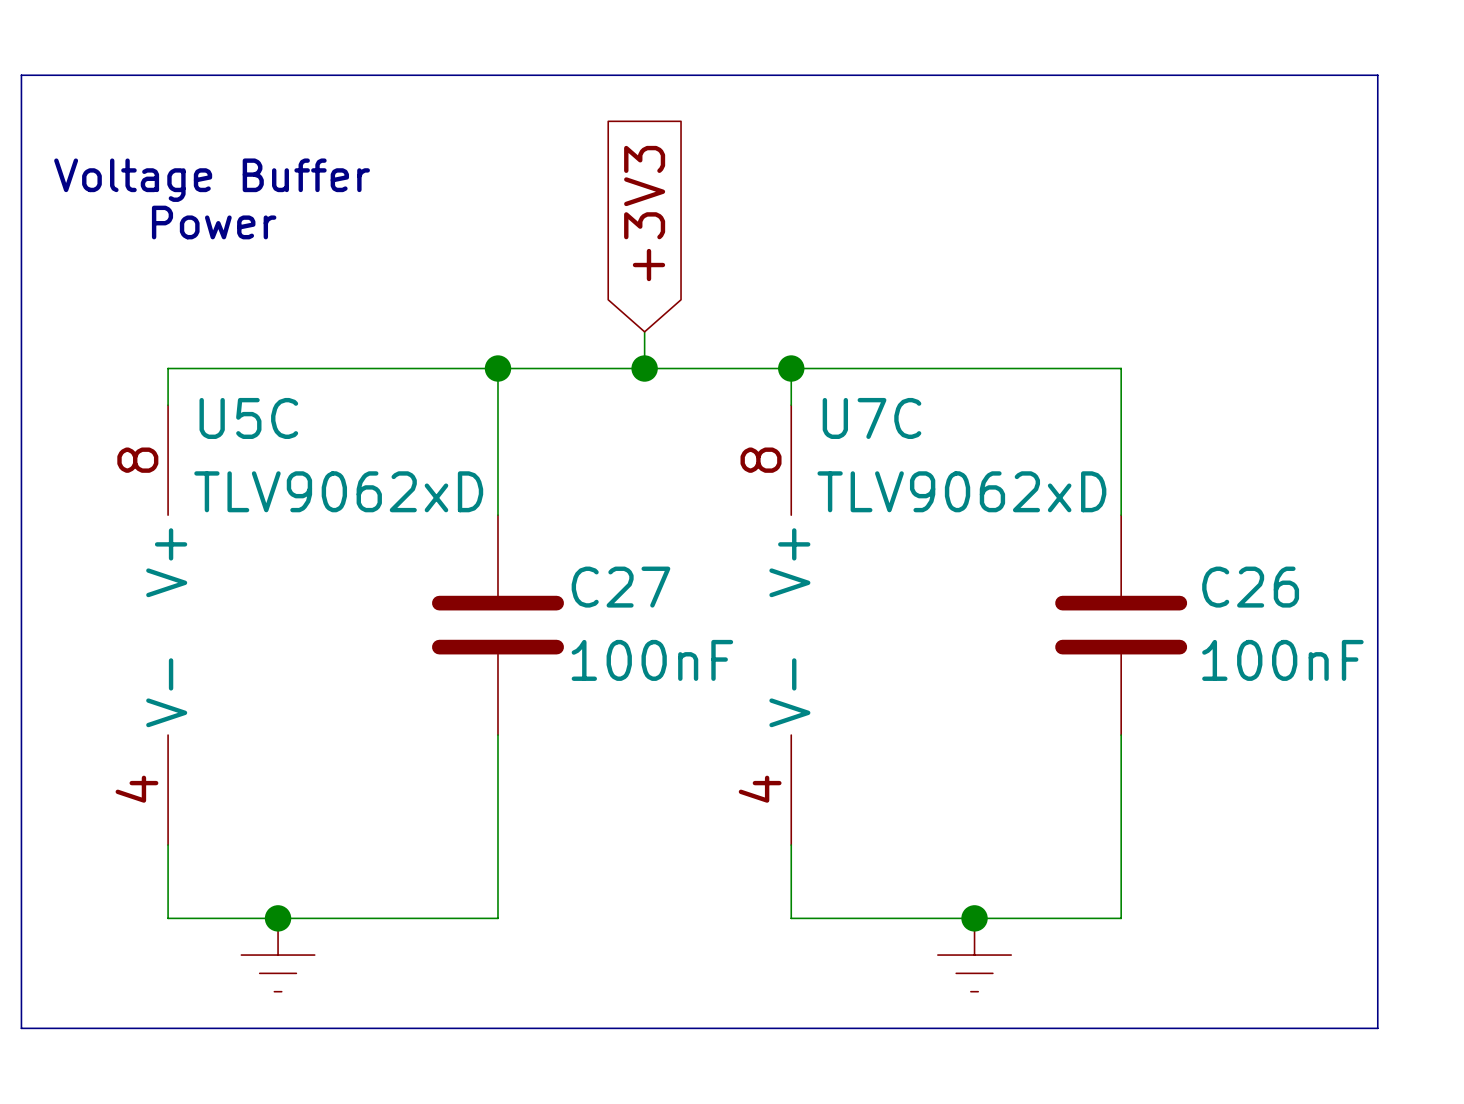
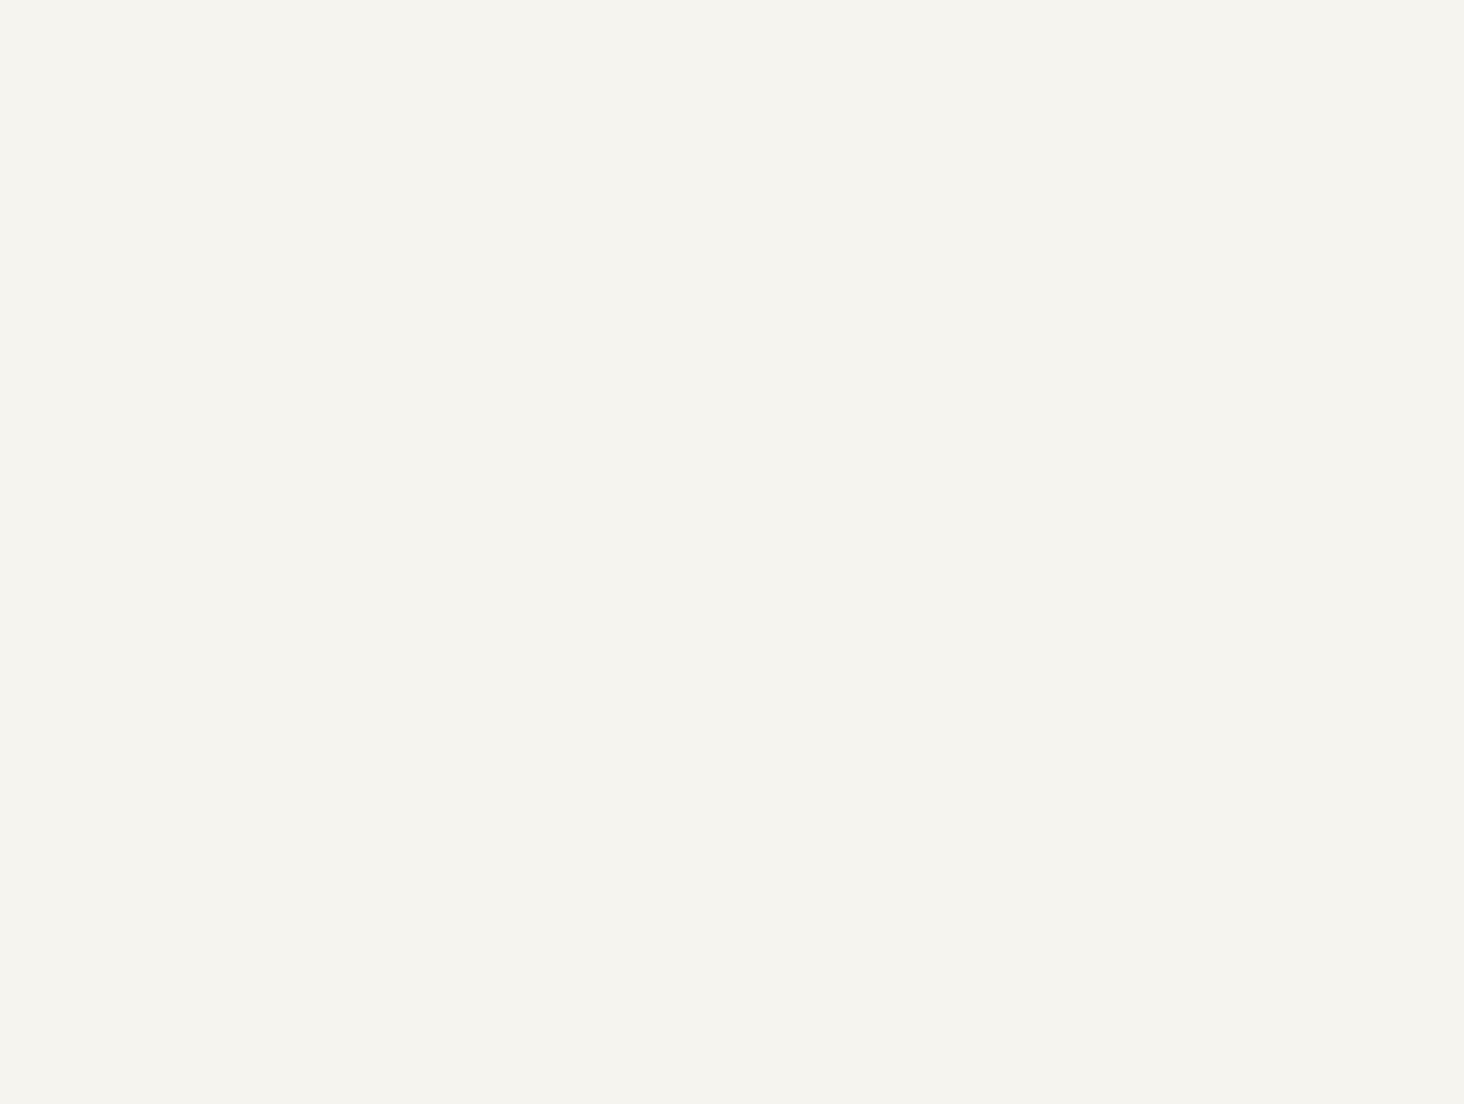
line: (21, 75) (1377, 75) (1377, 1028) (21, 1028) (21, 75) -> none
text: Voltage Buffer (212, 180) -> none
global label: +3V3 (644, 213) -> none
text: Power (214, 222) -> none
wire: (644, 331) (644, 368) -> none
wire: (497, 368) (497, 515) -> none
junction: (497, 368) -> none
junction: (644, 368) -> none
wire: (791, 368) (791, 405) -> none
junction: (791, 368) -> none
wire: (168, 405) (168, 368) (1121, 368) (1121, 515) -> none
U5C: TLV9062xD (168, 625) -> none
C27: 100nF (497, 625) -> none
U7C: TLV9062xD (791, 625) -> none
C26: 100nF (1121, 625) -> none
wire: (497, 735) (497, 918) (168, 918) (168, 845) -> none
wire: (1121, 735) (1121, 918) (791, 918) (791, 845) -> none
junction: (278, 918) -> none
junction: (974, 918) -> none
power symbol: (278, 955) -> none
power symbol: (974, 955) -> none

